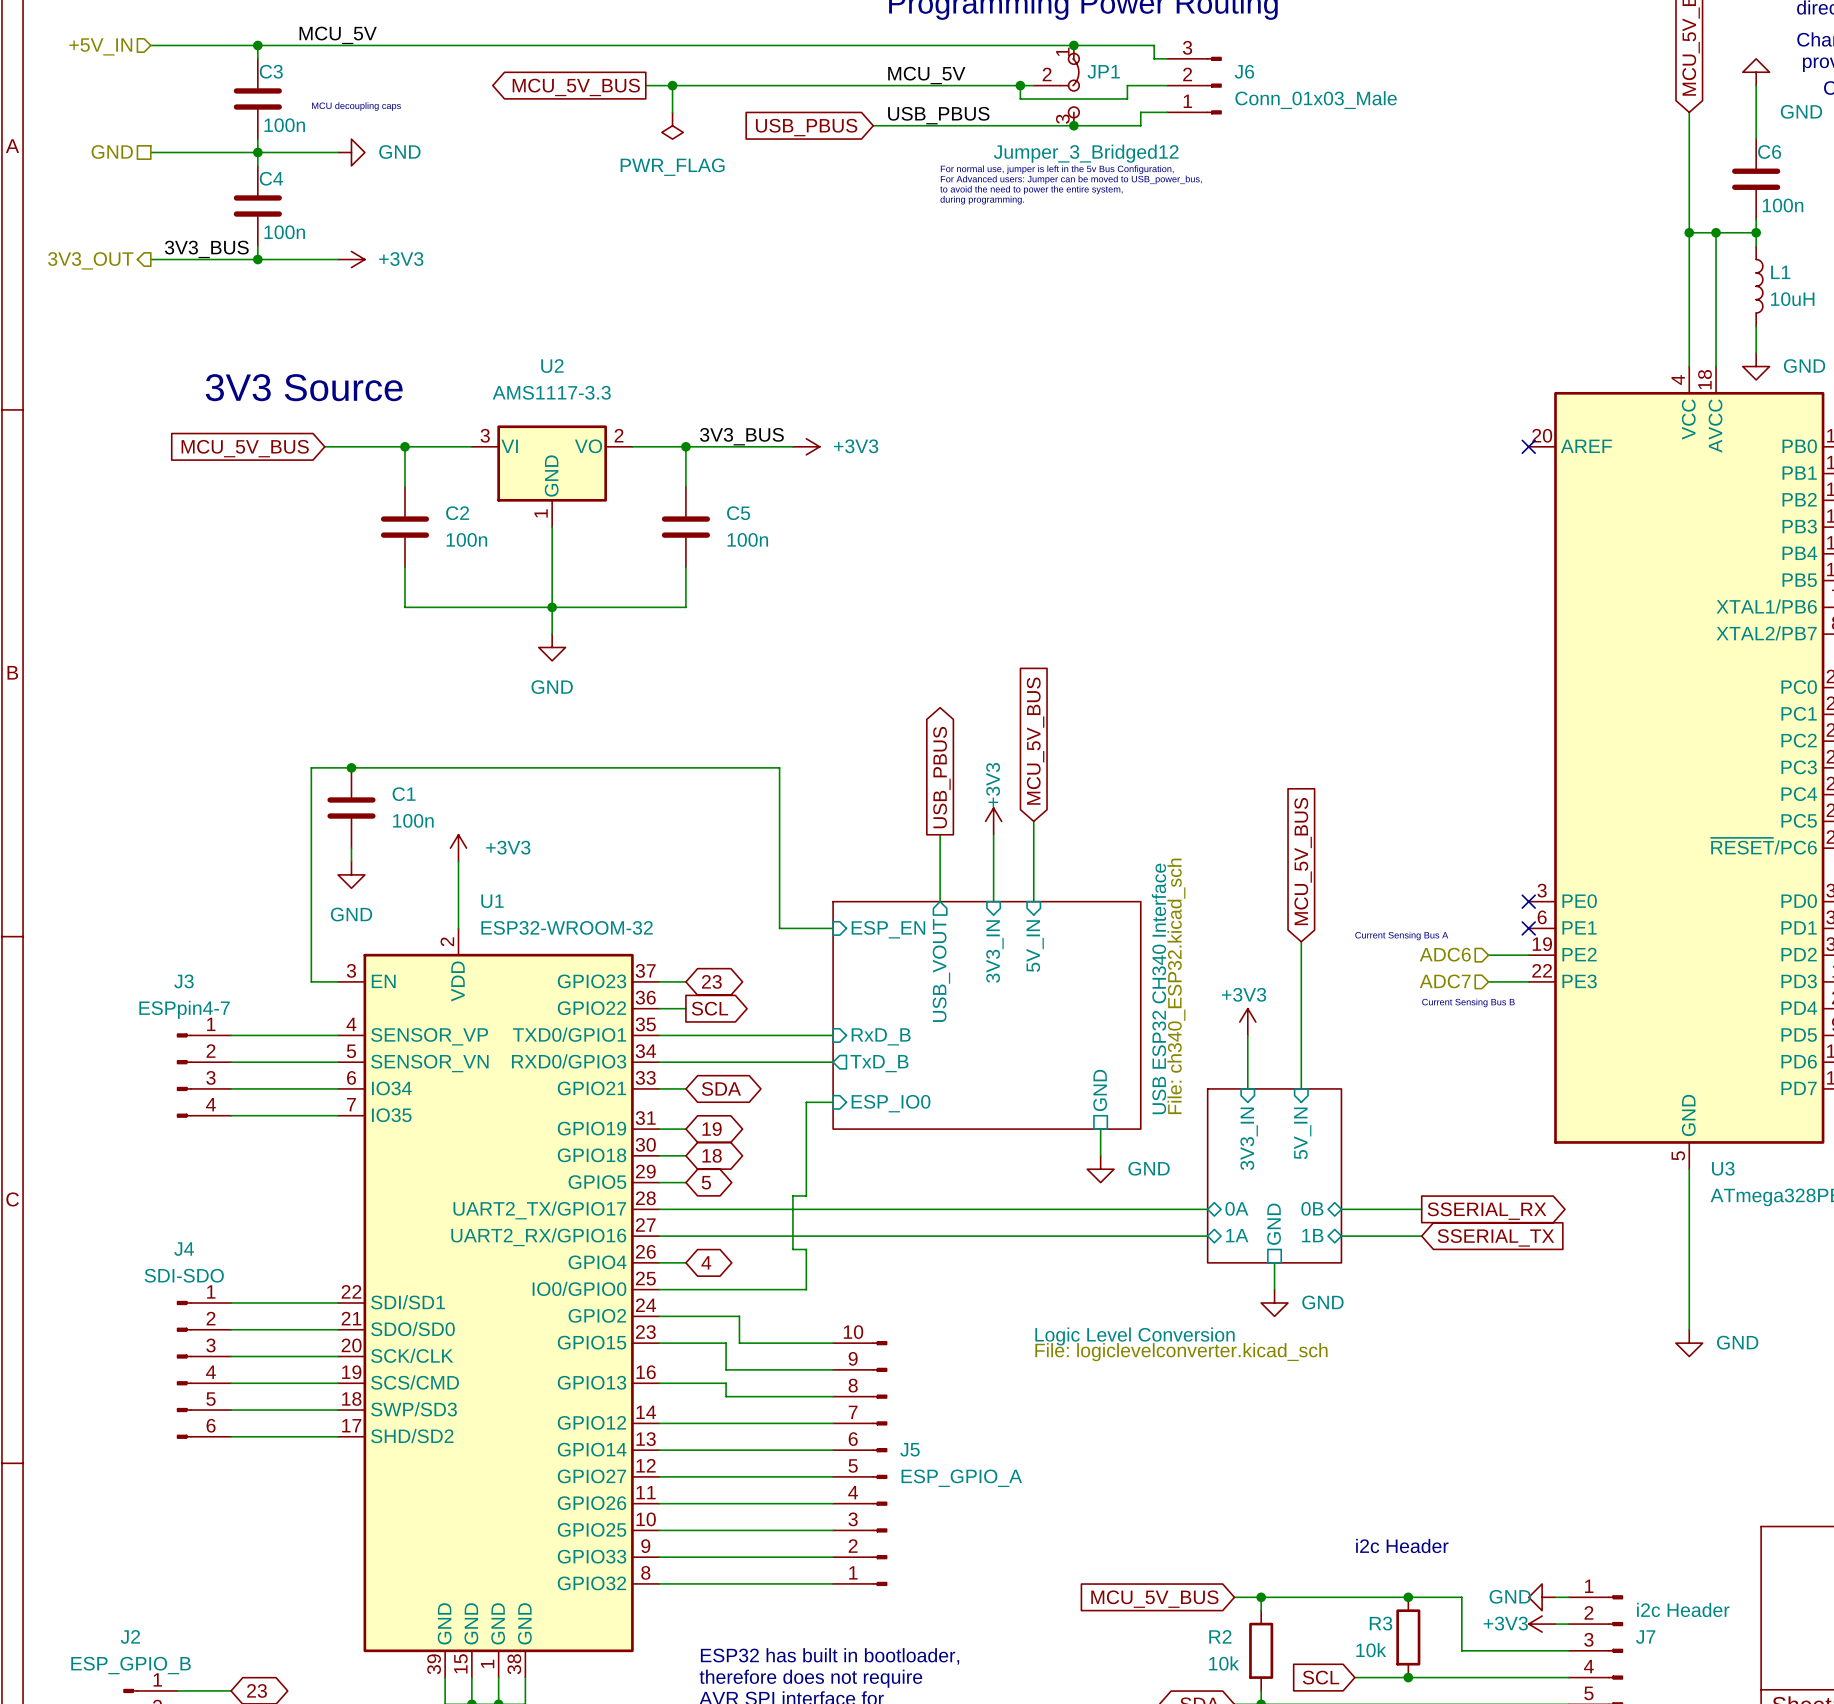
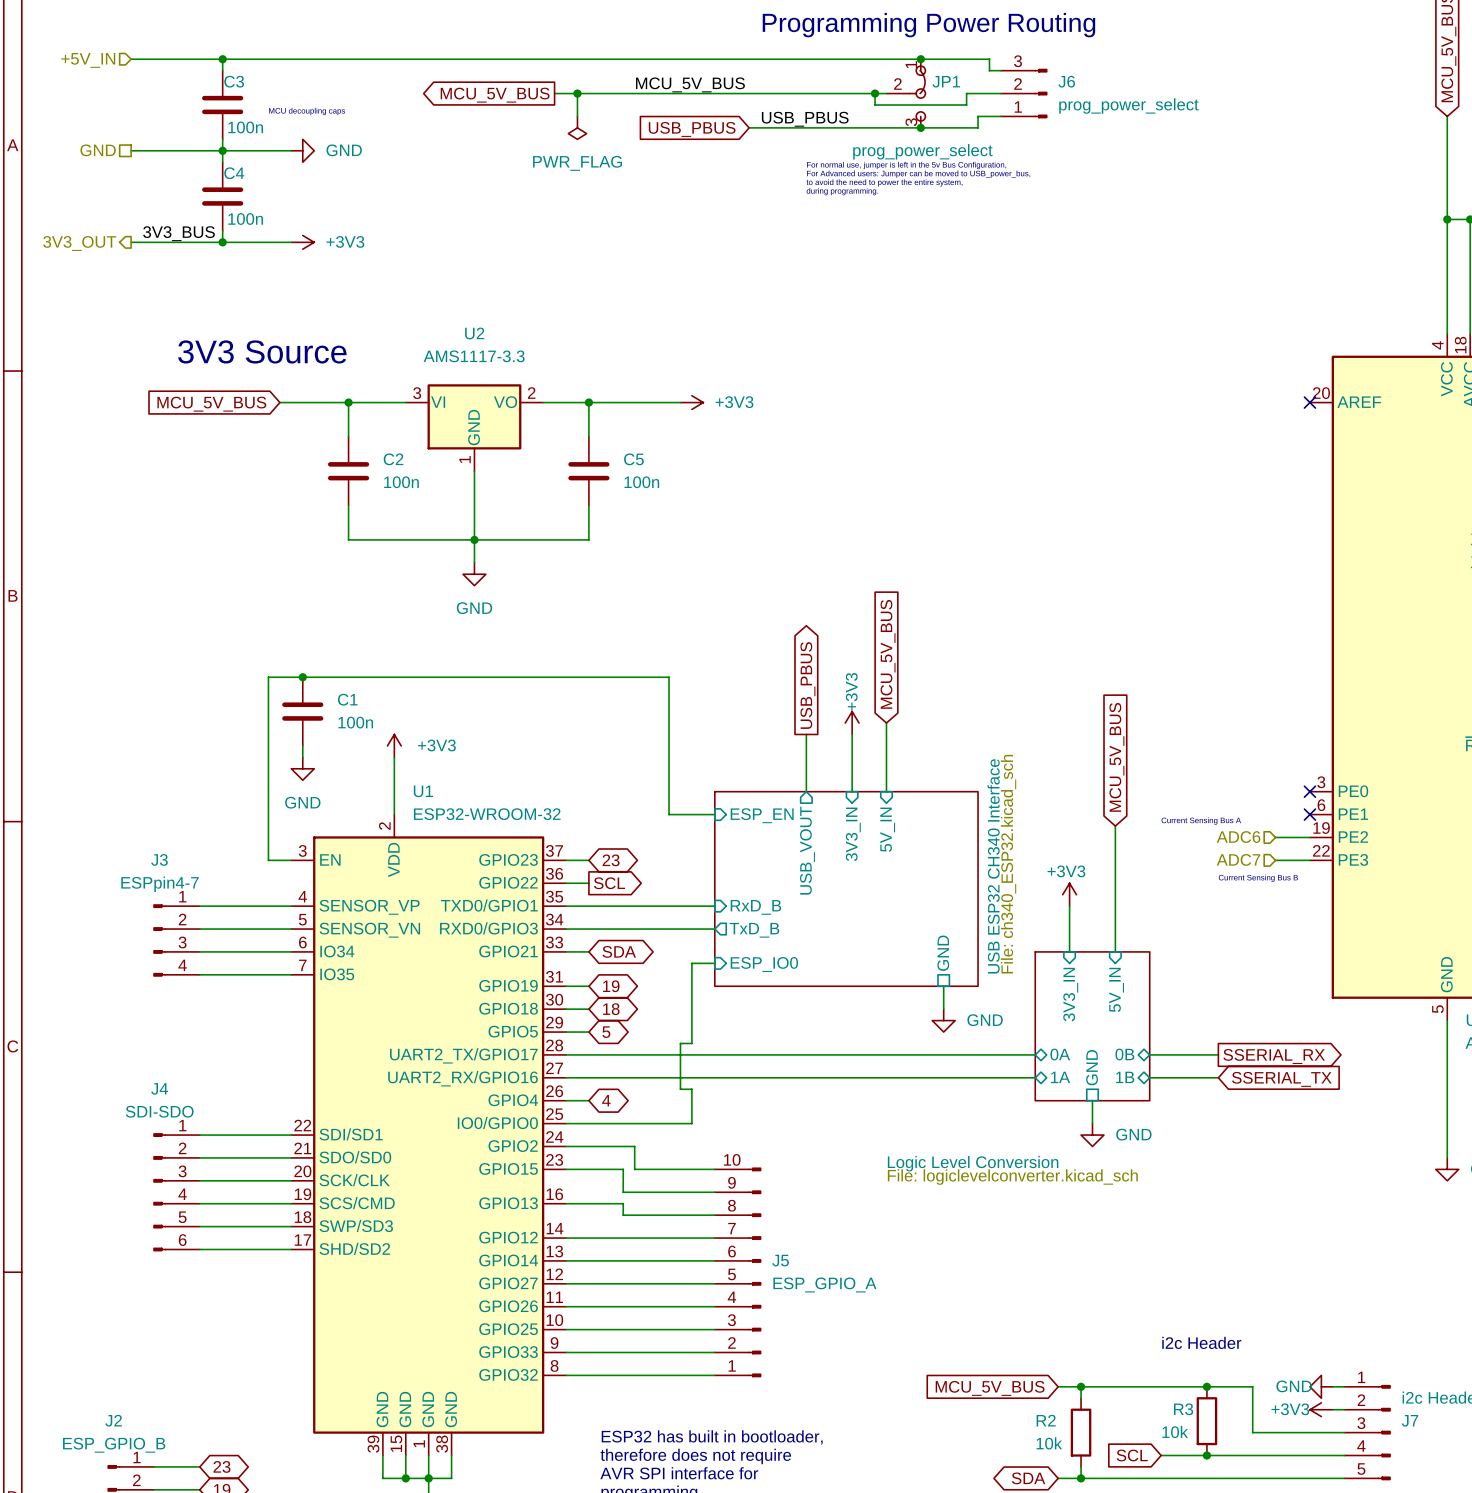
label: MCU_5V (338, 35) -> none
label: none -> MCU_5V_BUS (690, 84)
label: MCU_5V (926, 75) -> none
J6 value: Conn_01x03_Male (1316, 100) -> prog_power_select (1128, 105)
JP1 value: Jumper_3_Bridged12 (1086, 153) -> prog_power_select (922, 151)
label: 3V3_BUS (741, 436) -> none

